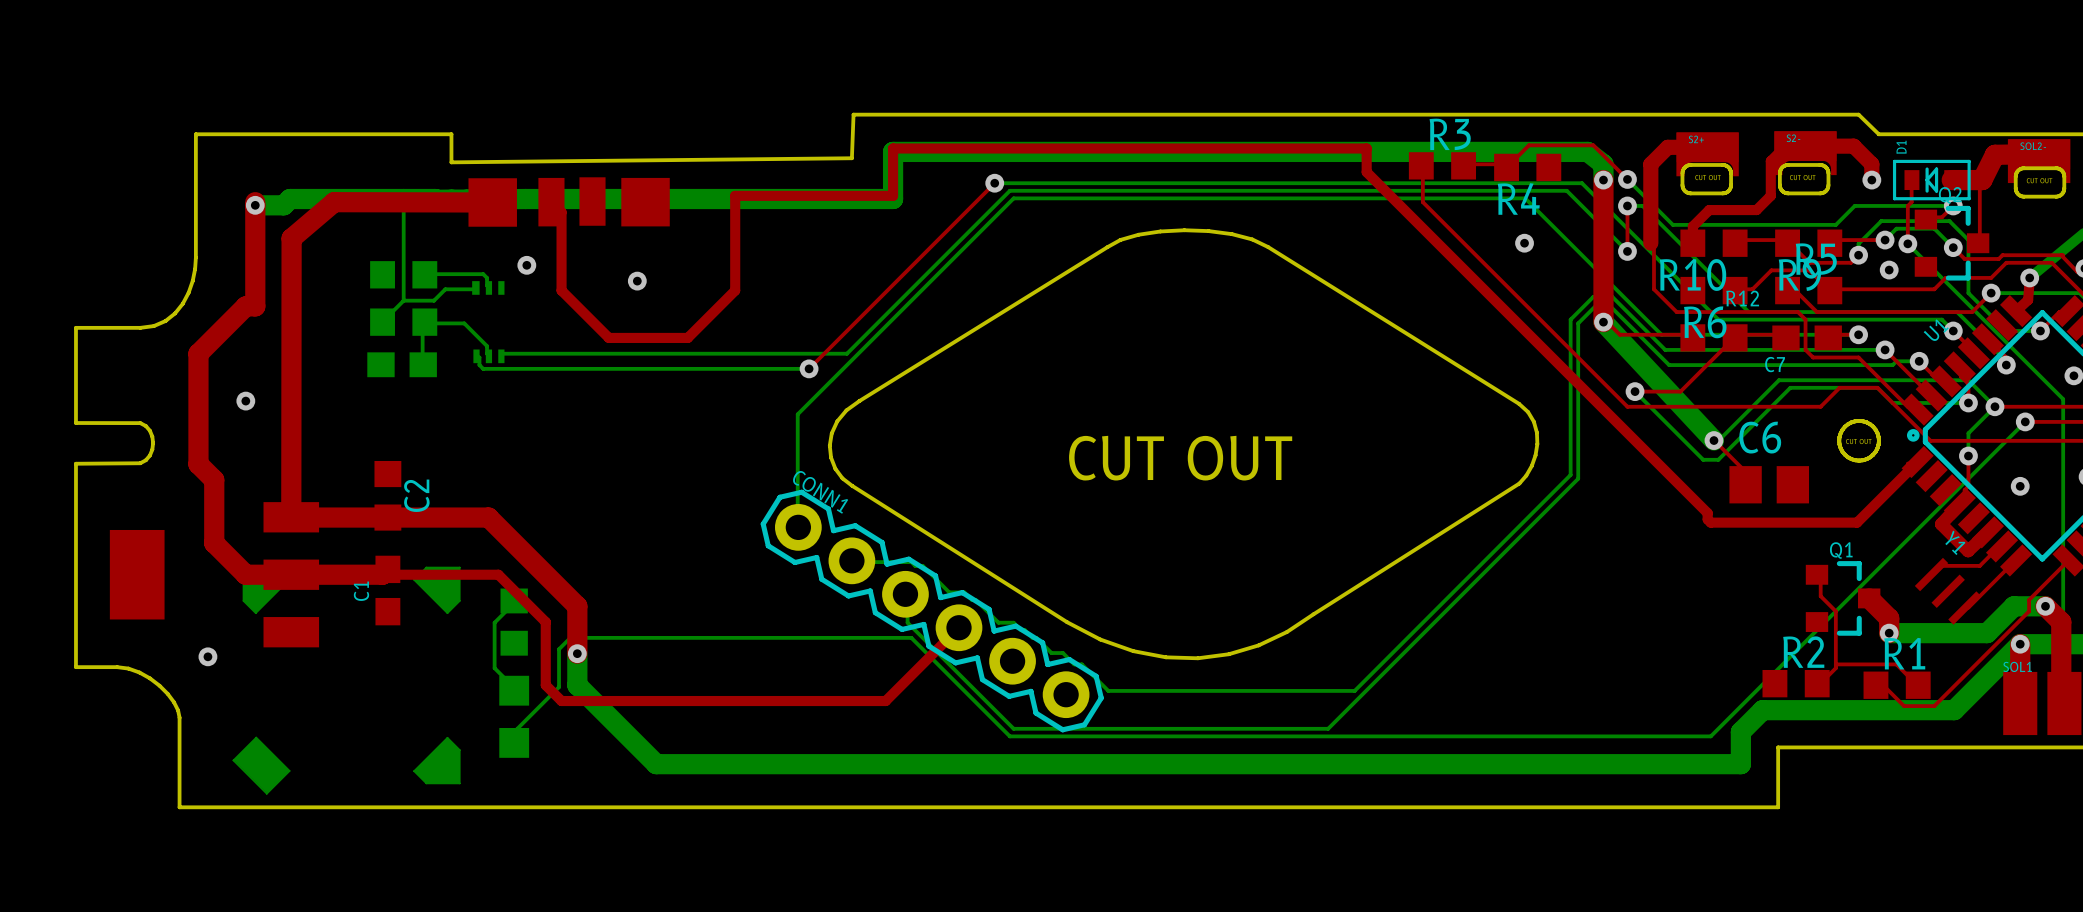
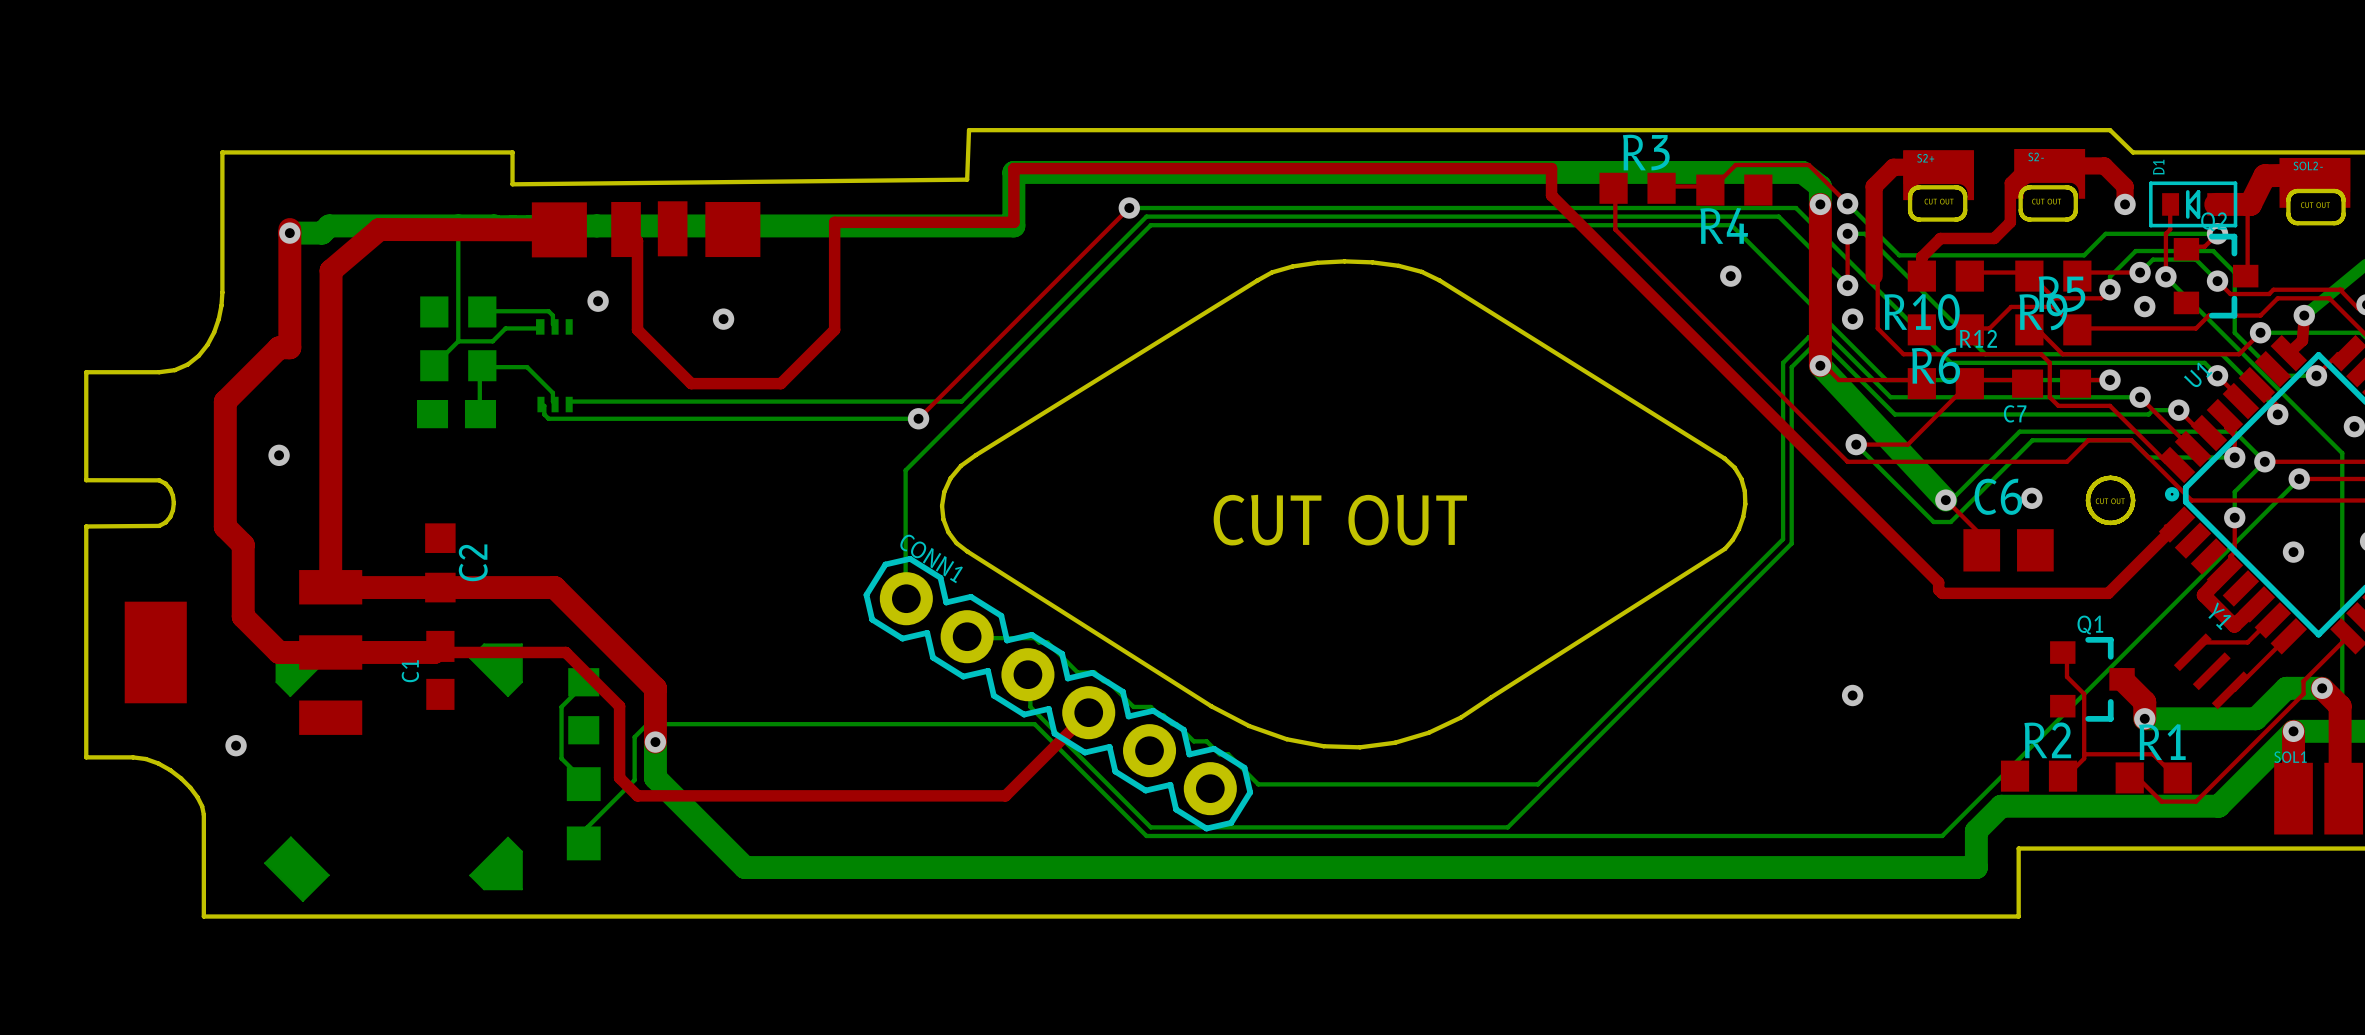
via: none -> (1852, 319)
via: none -> (2031, 498)
via: none -> (1852, 695)

